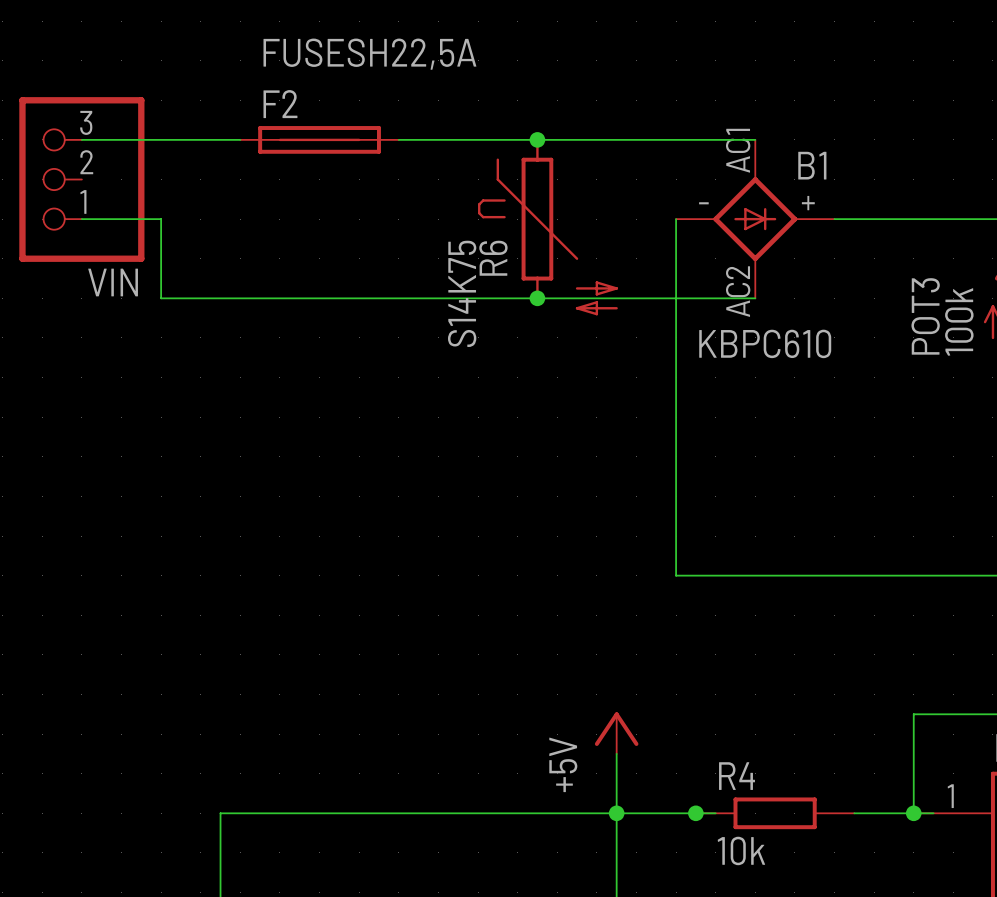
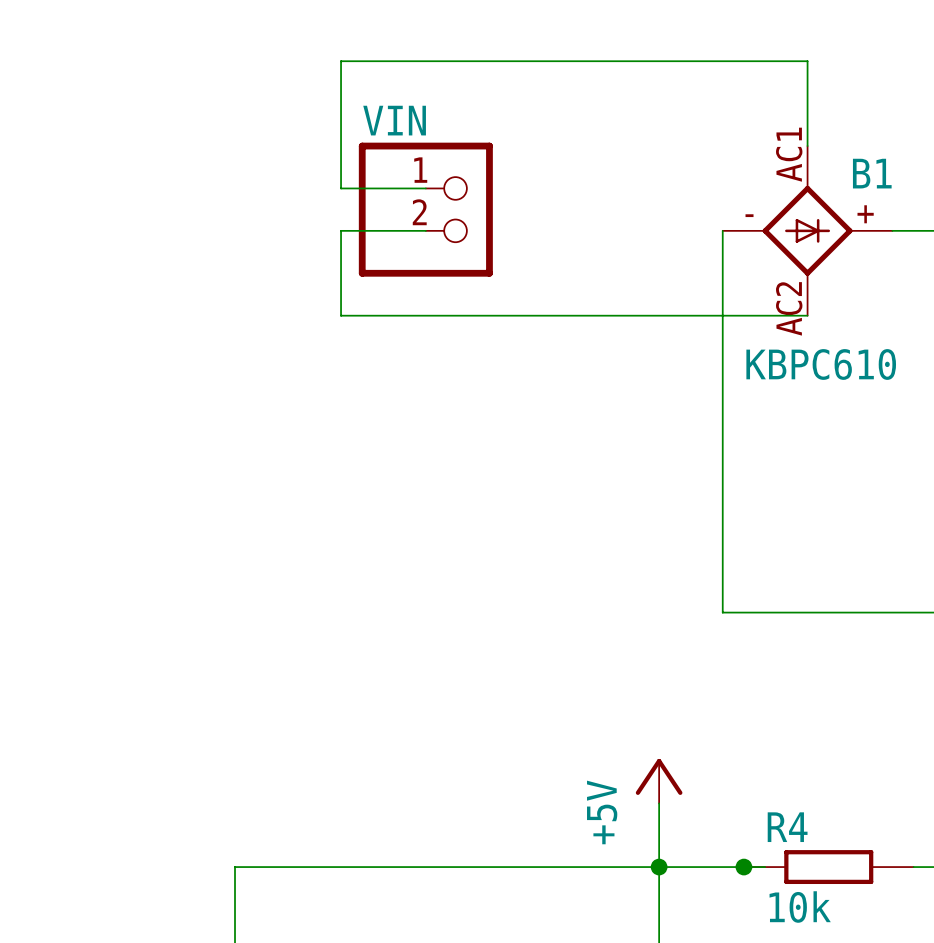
wire: (81, 139) (240, 139) -> none
F2: FUSESH22,5A (319, 139) -> none
wire: (398, 139) (755, 139) -> (425, 188) (341, 188) (341, 61) (807, 61) (807, 146)
junction: (537, 139) -> none
VIN: (81, 179) -> none
VIN: none -> (425, 209)
wire: (81, 219) (161, 219) (161, 298) (319, 298) -> (425, 230) (341, 230) (341, 315)
R6: S14K75 (547, 227) -> none
junction: (537, 298) -> none

